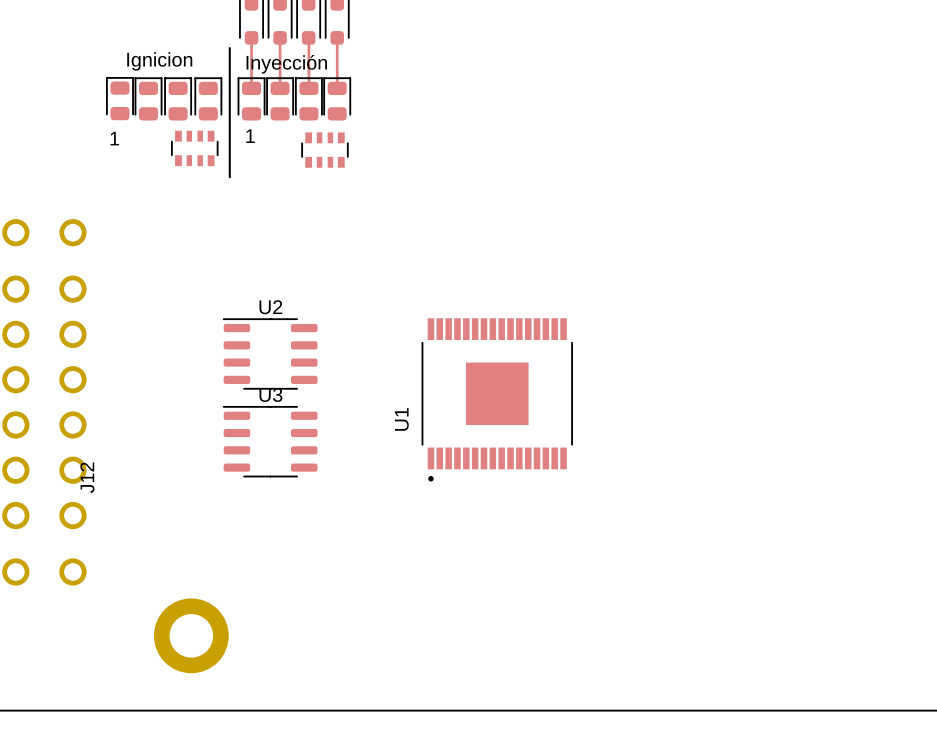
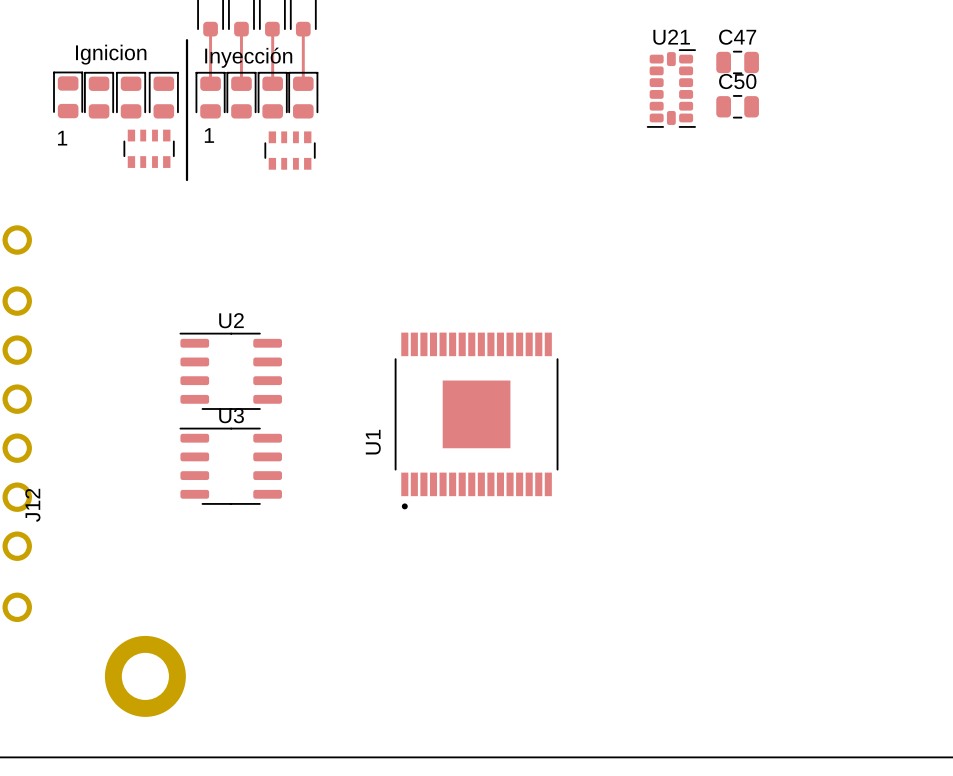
C47: none -> (737, 62)
U21: none -> (671, 88)
C50: none -> (737, 106)

